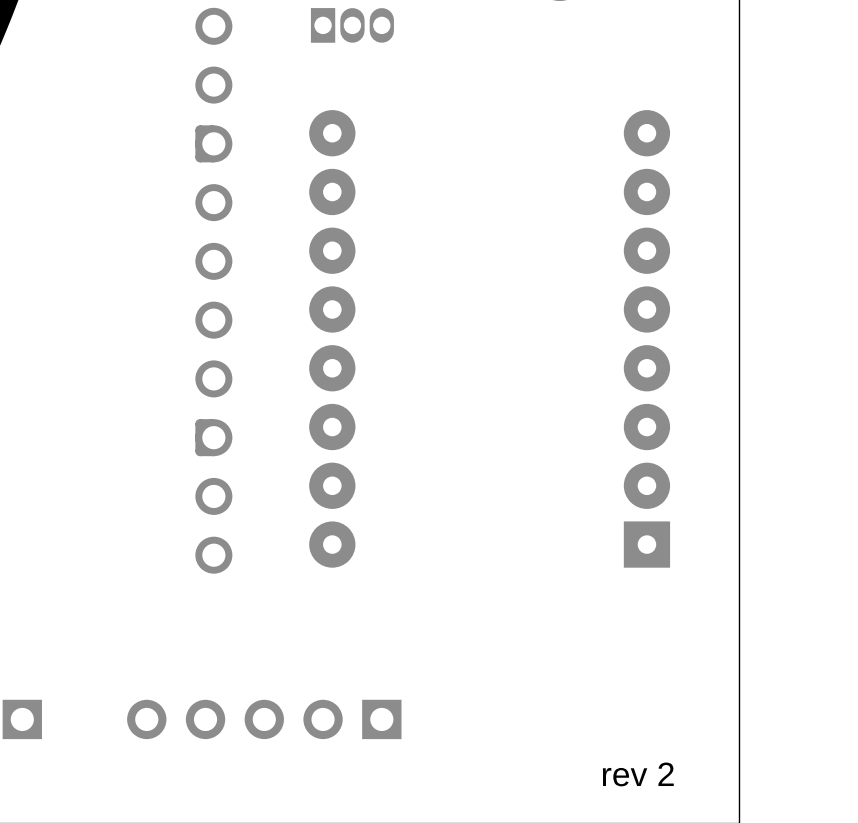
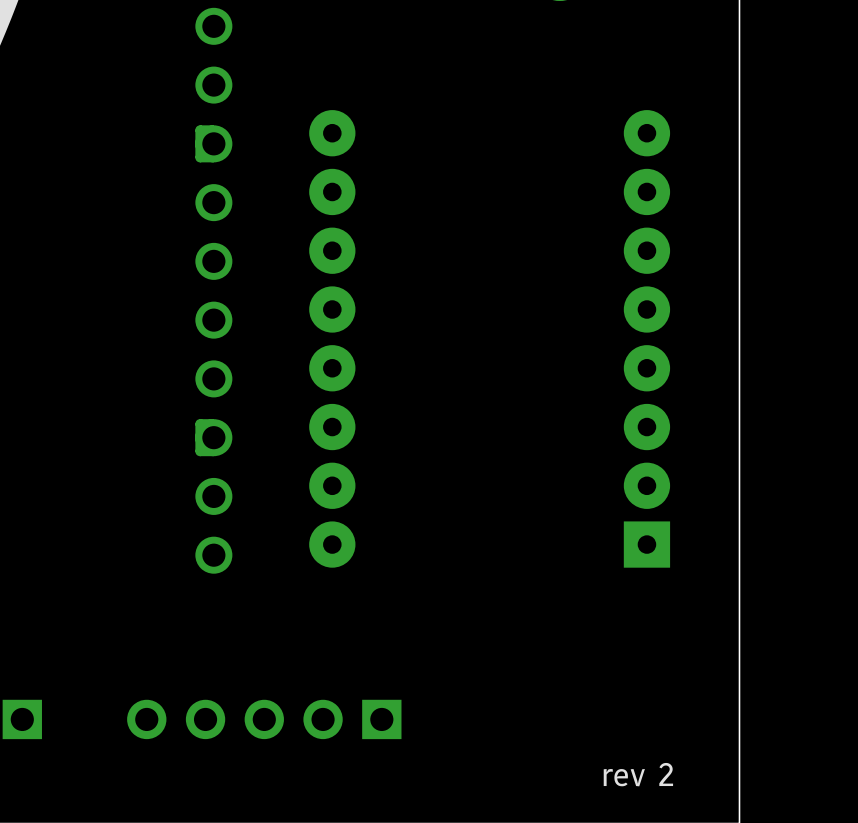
part: (352, 25) -> none

